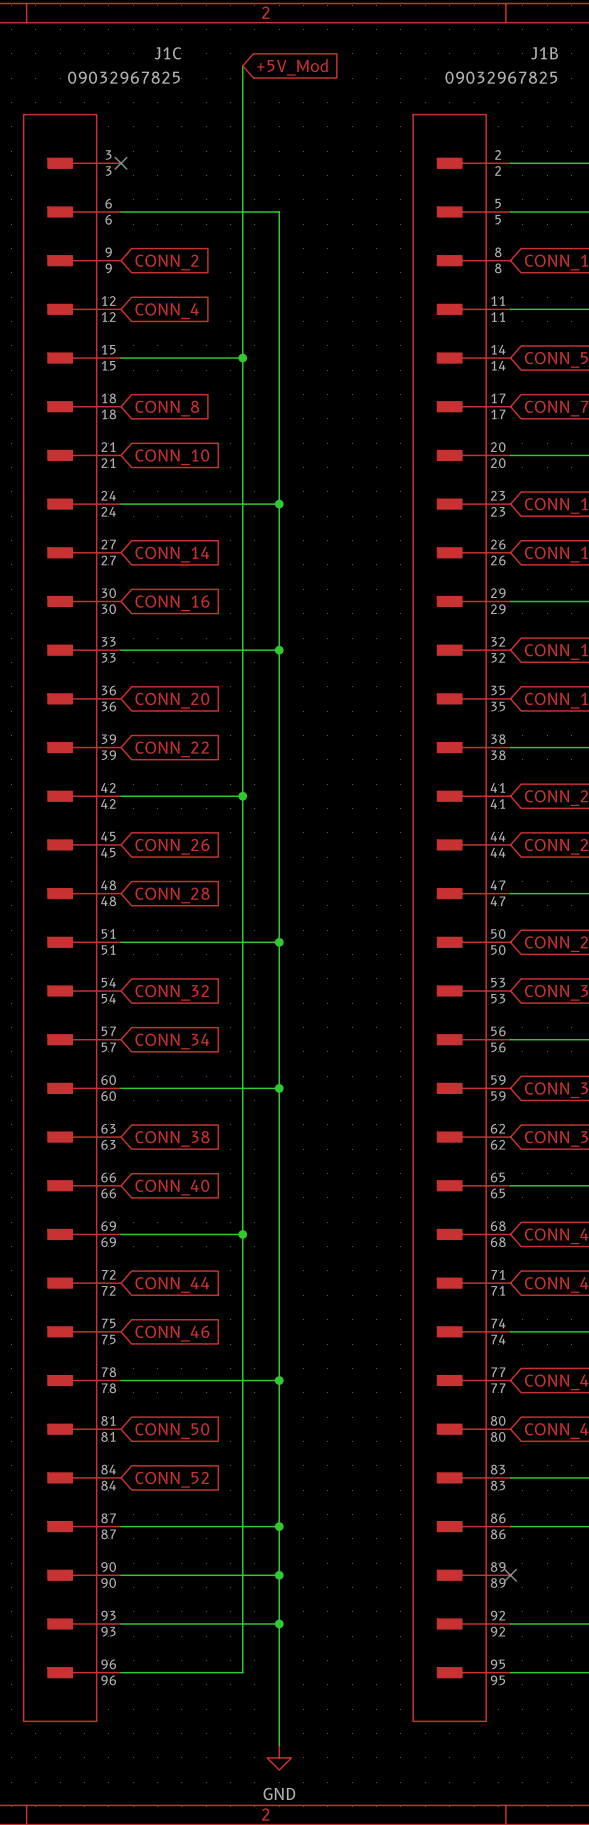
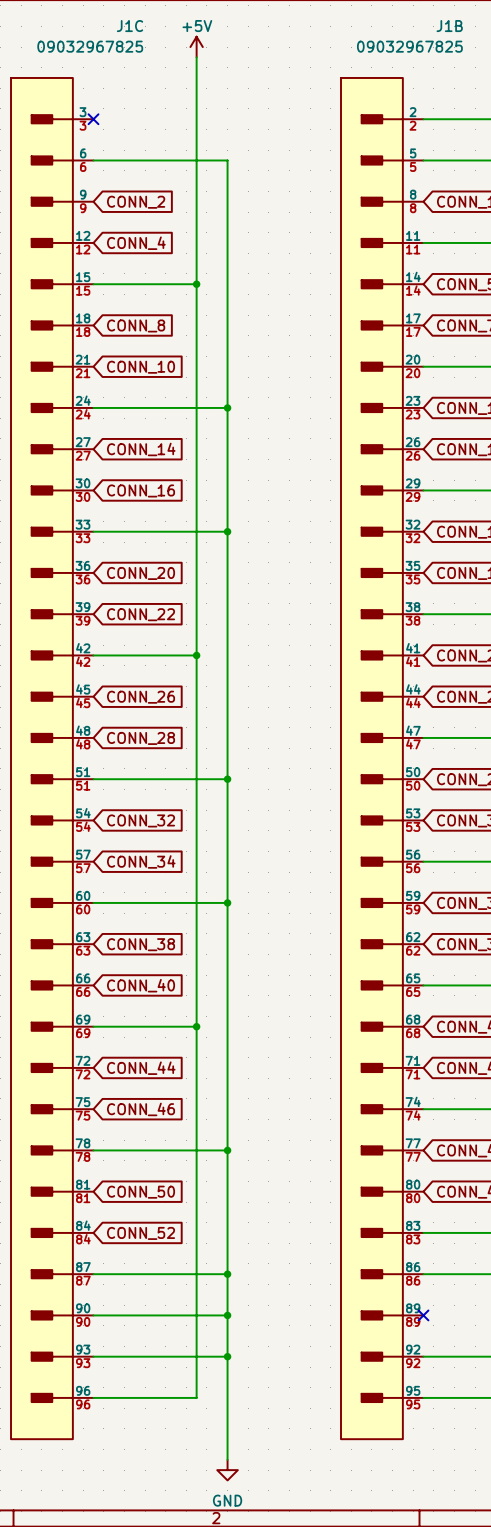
global label: +5V_Mod (292, 67) -> none
power symbol: none -> +5V (196, 47)

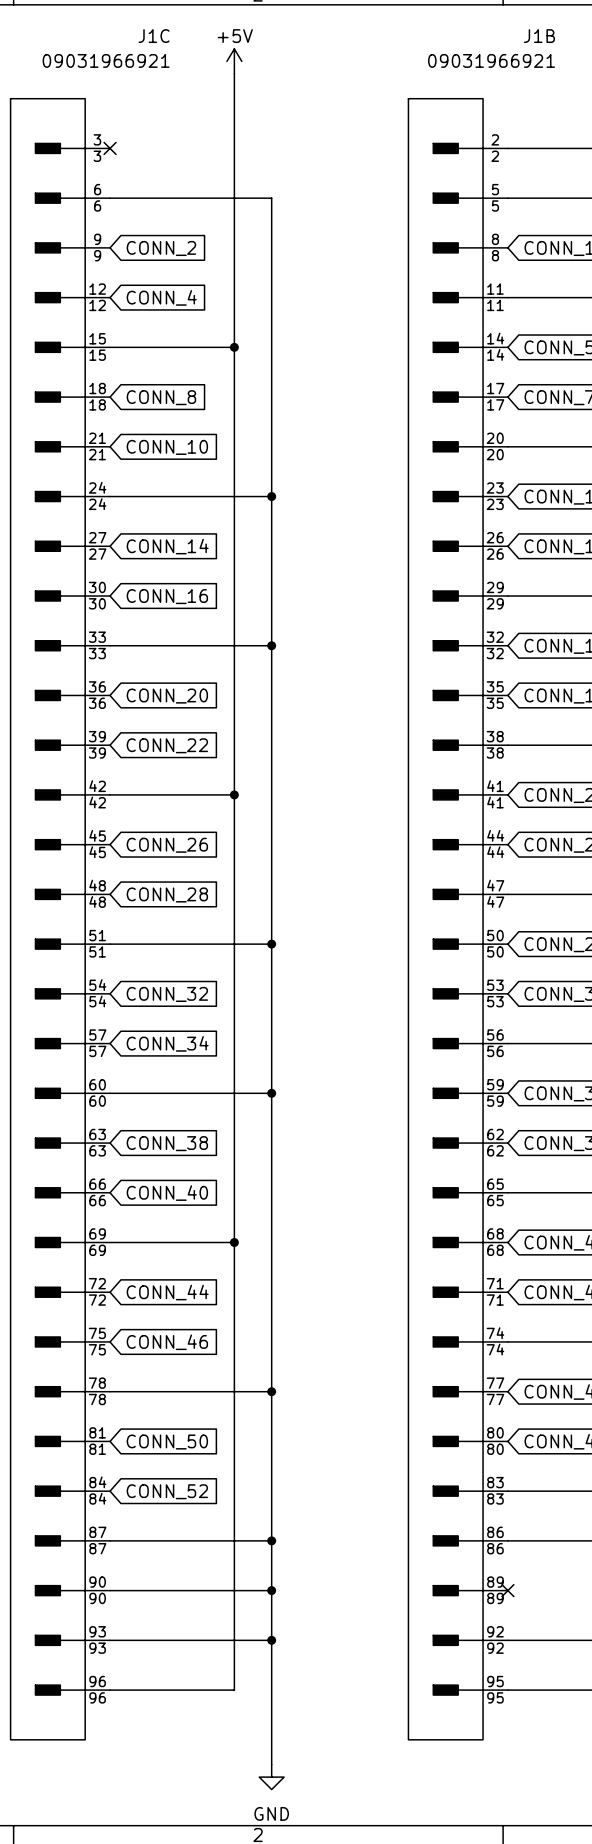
J1C value: 09032967825 (90, 46) -> 09031966921 (106, 60)
J1B value: 09032967825 (409, 46) -> 09031966921 (491, 60)

